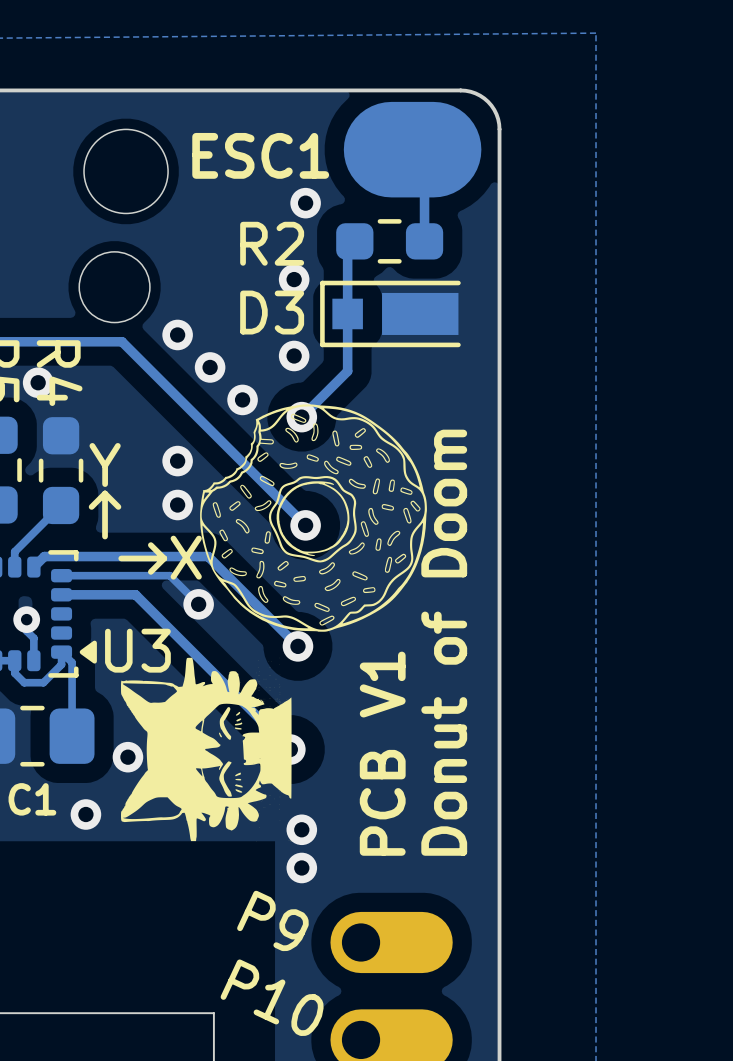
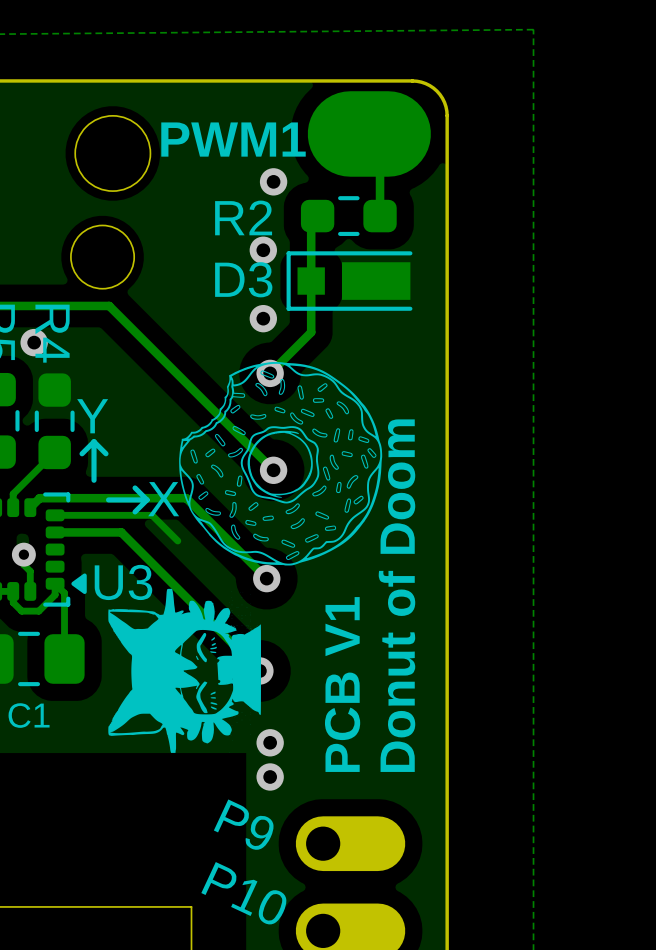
ESC1 name: ESC1 (260, 155) -> PWM1 (233, 139)
via: (177, 334) -> none
via: (210, 367) -> none
via: (242, 399) -> none
via: (177, 461) -> none
via: (177, 505) -> none
via: (198, 604) -> none
via: (127, 757) -> none
via: (85, 814) -> none

